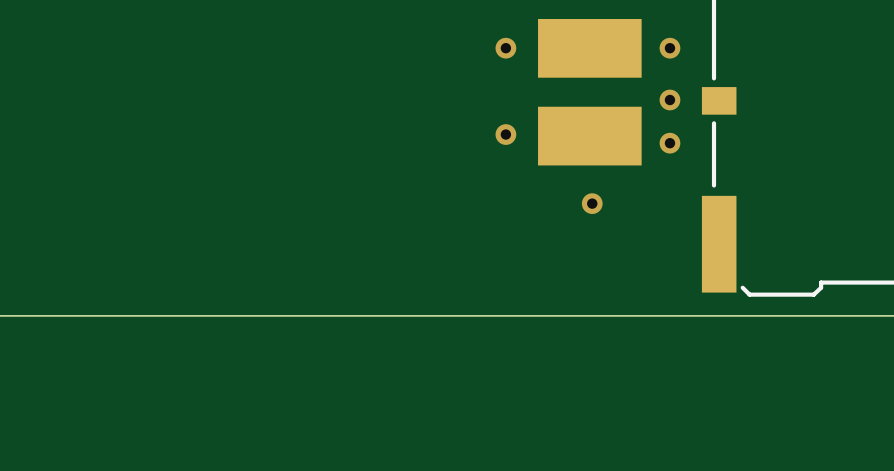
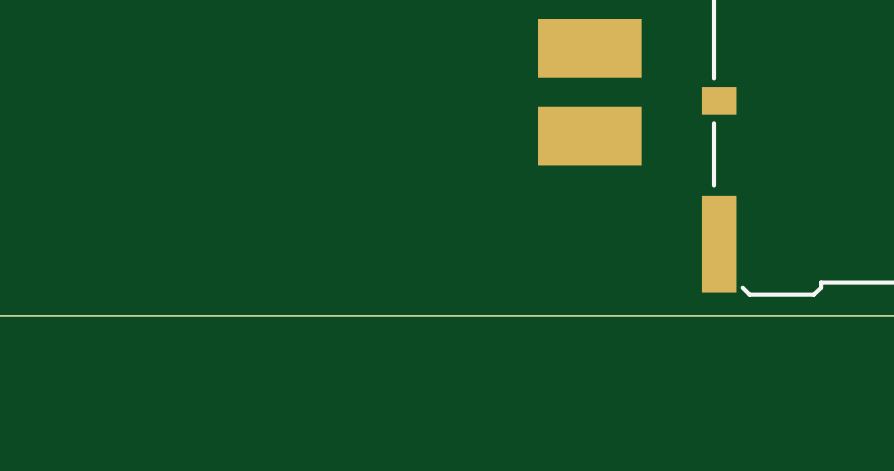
via: (505, 48) -> none
via: (669, 48) -> none
via: (669, 100) -> none
via: (505, 134) -> none
via: (669, 143) -> none
via: (592, 203) -> none

